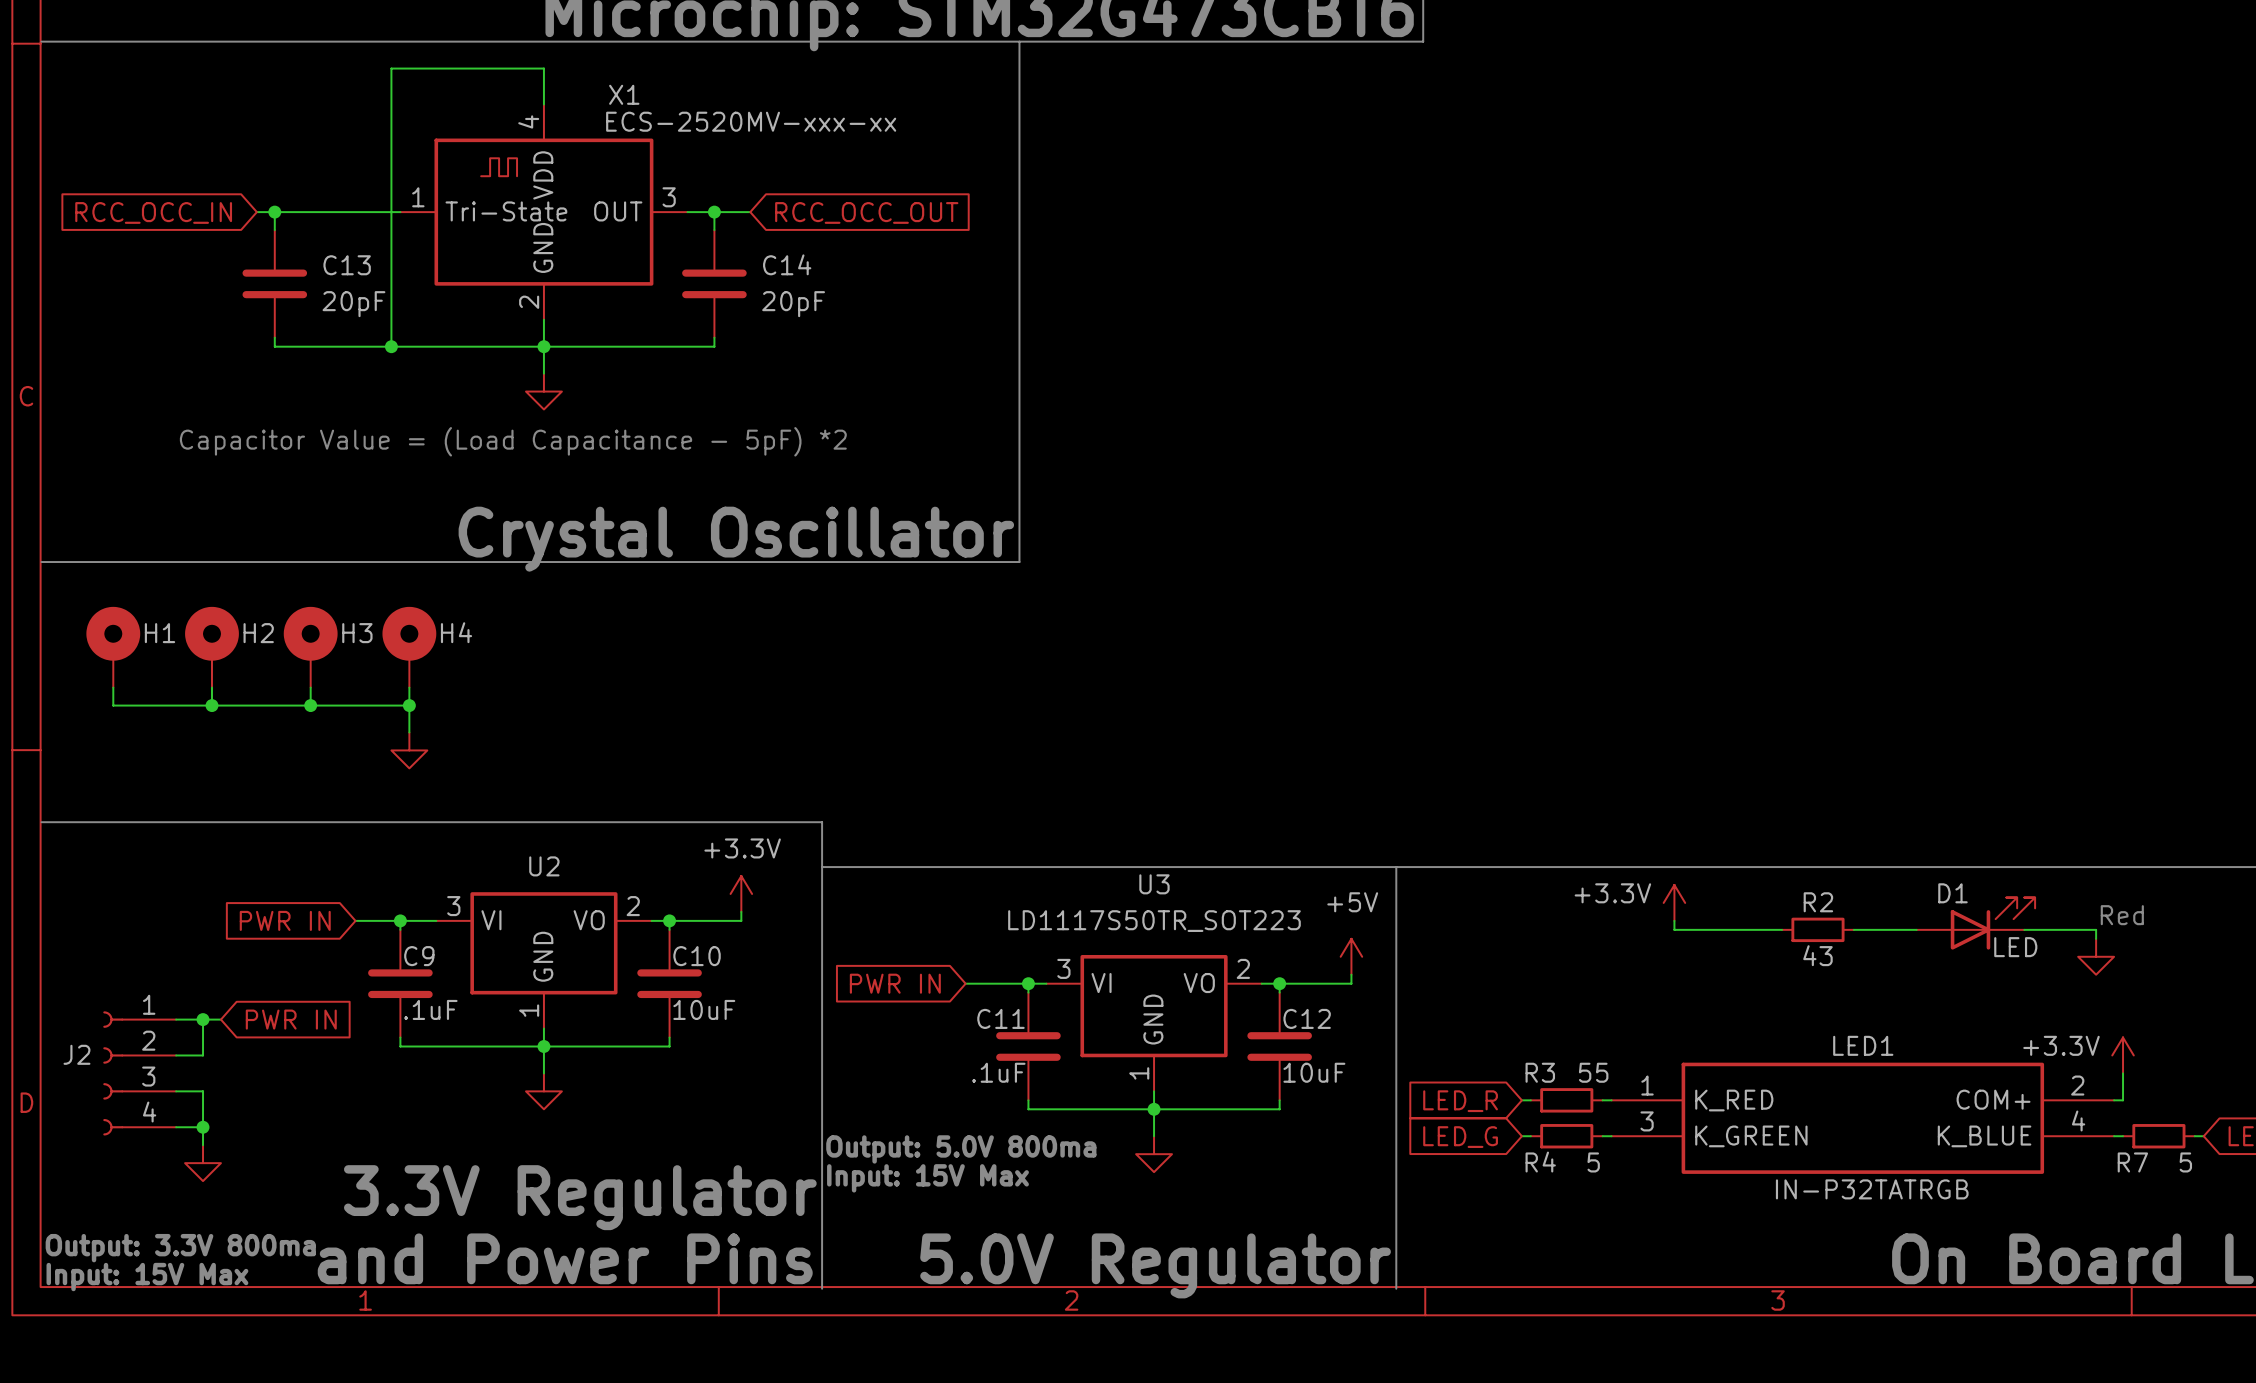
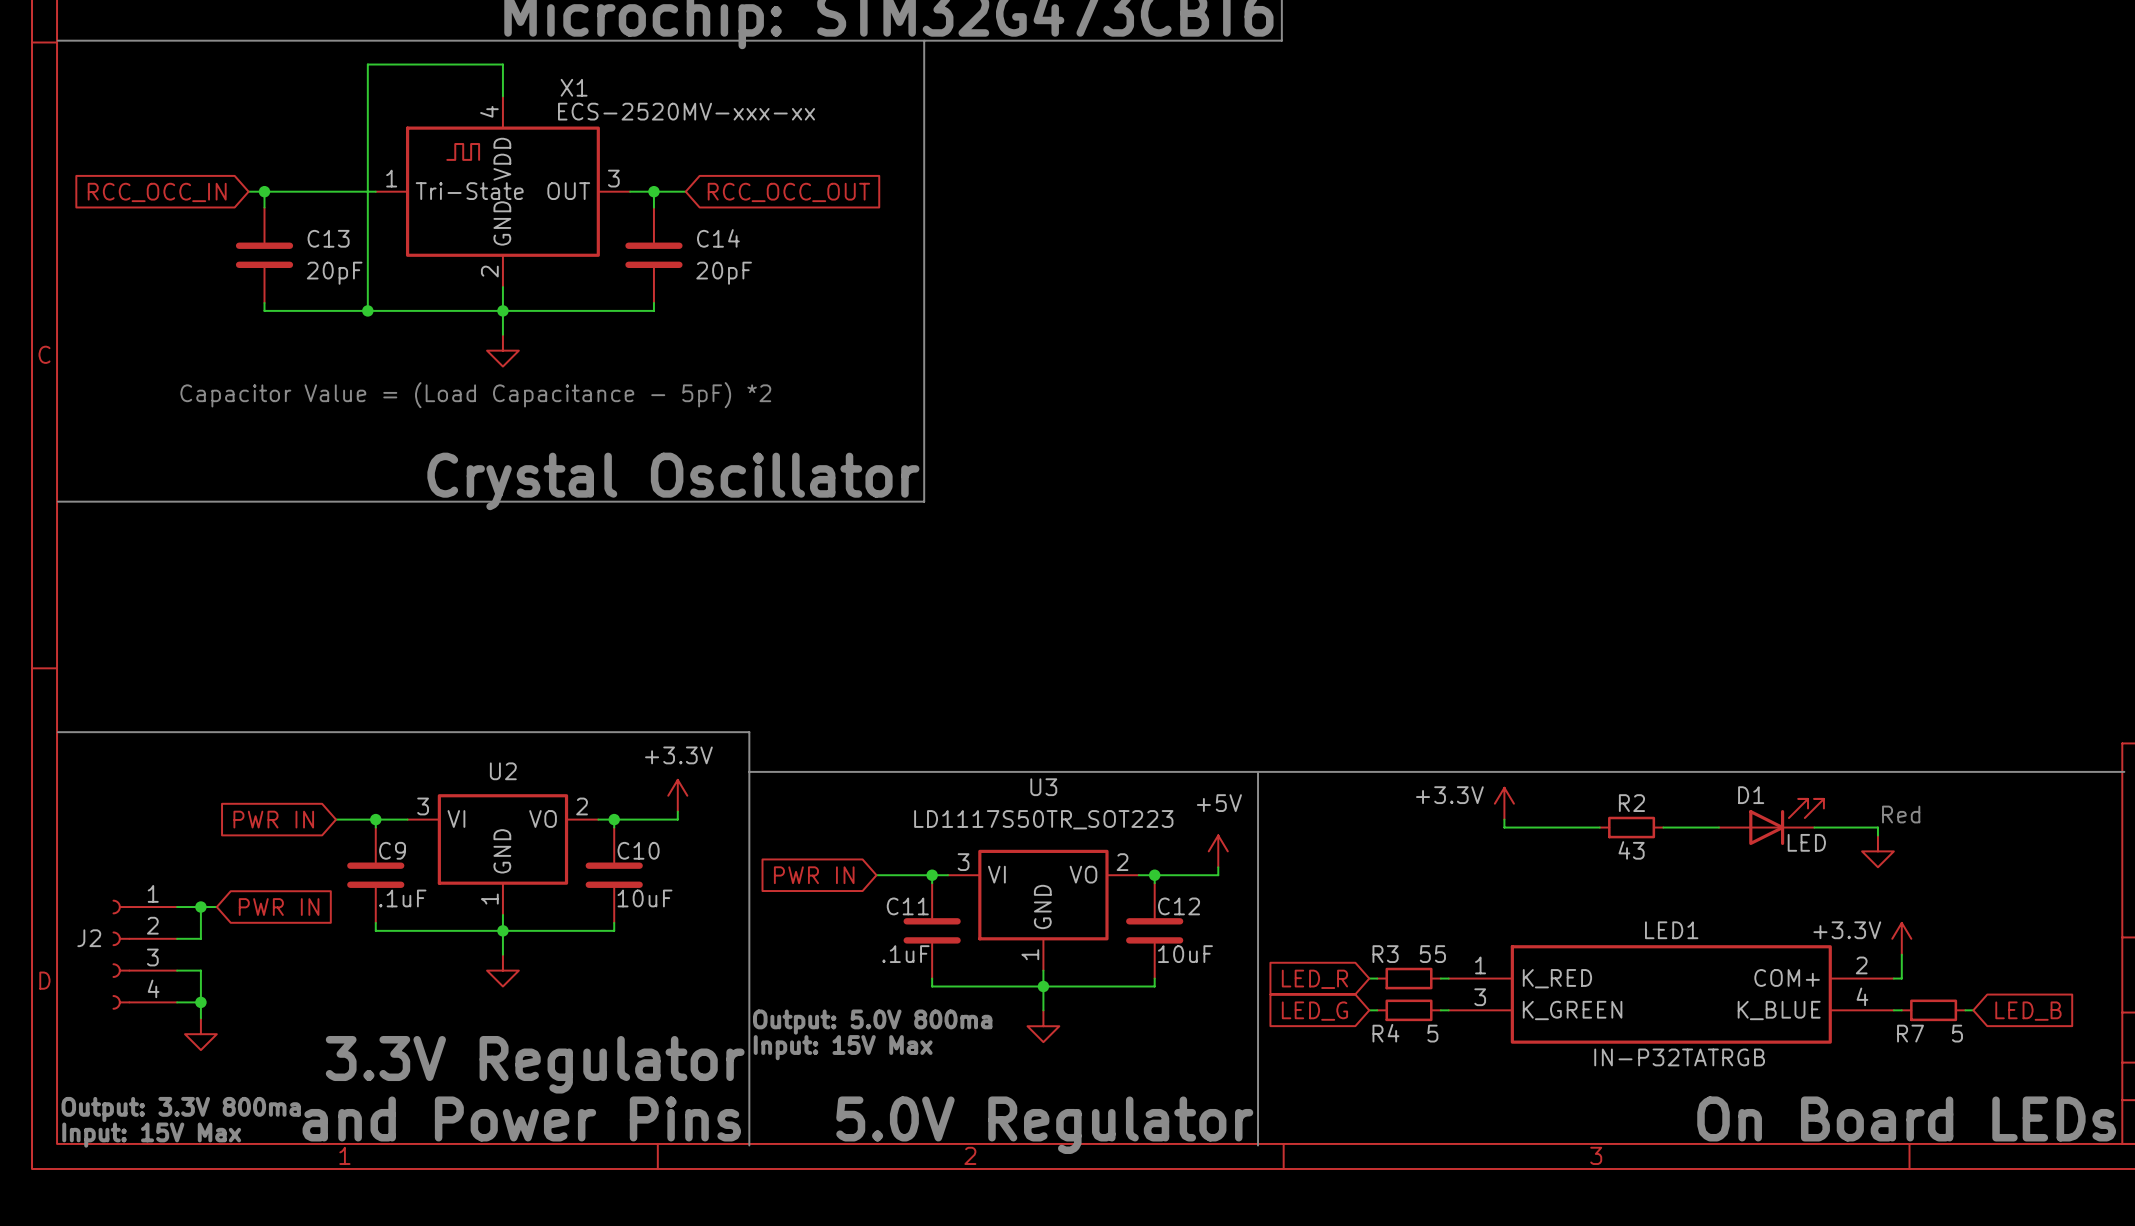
H1: (113, 647) -> none
H2: (211, 647) -> none
H3: (310, 647) -> none
H4: (409, 647) -> none
wire: (113, 687) (113, 705) (409, 705) -> none
wire: (211, 687) (211, 705) -> none
wire: (310, 687) (310, 705) -> none
wire: (409, 687) (409, 732) -> none
junction: (211, 705) -> none
junction: (310, 705) -> none
junction: (409, 705) -> none
power symbol: (409, 750) -> none

